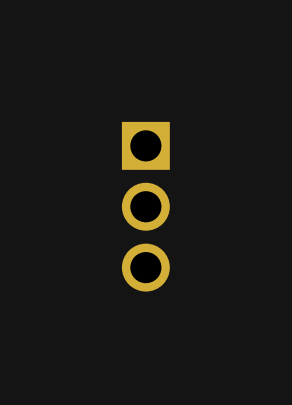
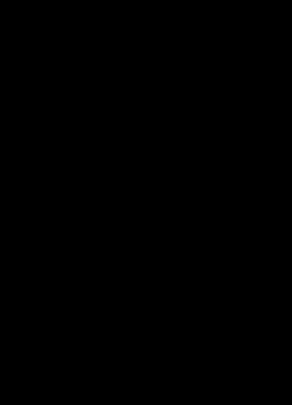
part: (145, 206) -> none

